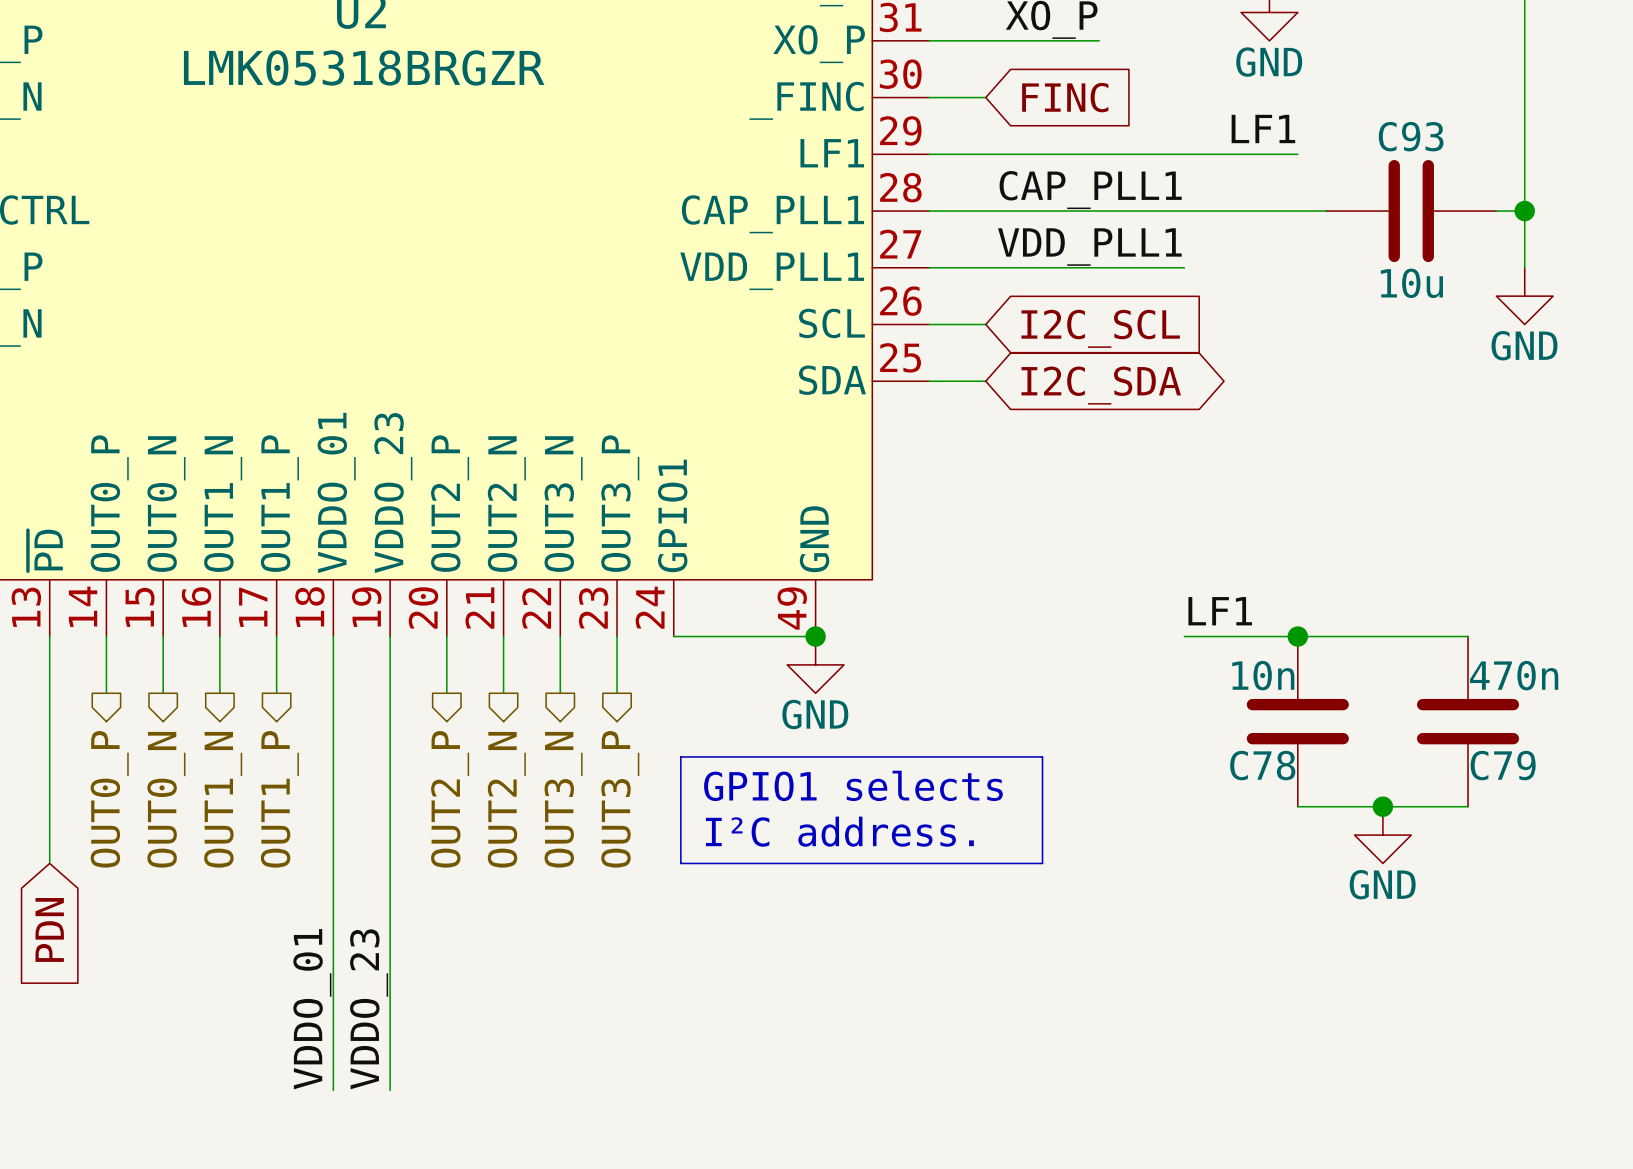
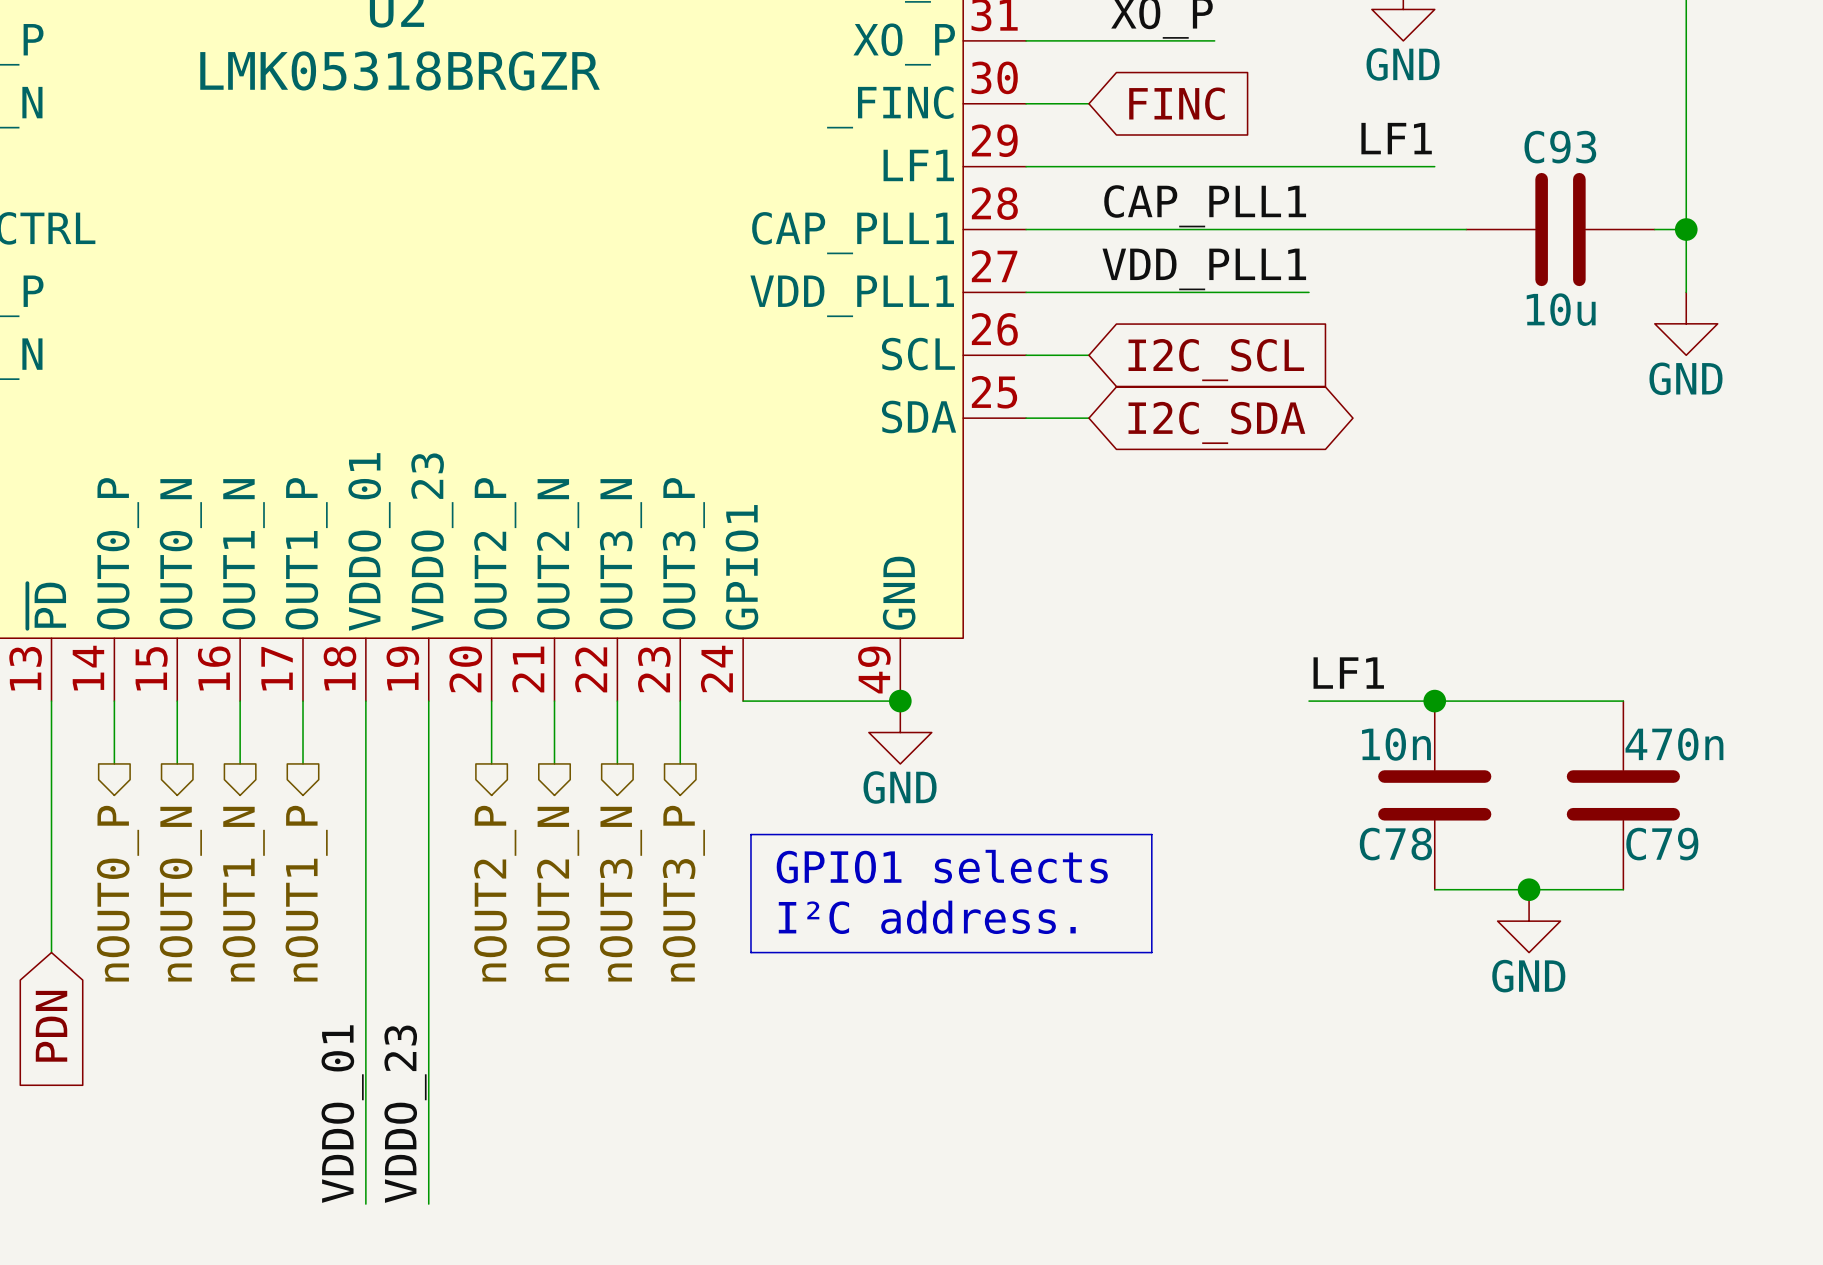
hierarchical label: OUT0_P (109, 799) -> nOUT0_P (118, 893)
hierarchical label: OUT0_N (166, 799) -> nOUT0_N (180, 894)
hierarchical label: OUT1_N (223, 799) -> nOUT1_N (243, 894)
hierarchical label: OUT1_P (279, 799) -> nOUT1_P (306, 893)
hierarchical label: OUT2_P (450, 799) -> nOUT2_P (495, 893)
hierarchical label: OUT2_N (506, 799) -> nOUT2_N (558, 894)
hierarchical label: OUT3_N (563, 799) -> nOUT3_N (621, 894)
hierarchical label: OUT3_P (620, 799) -> nOUT3_P (683, 893)

